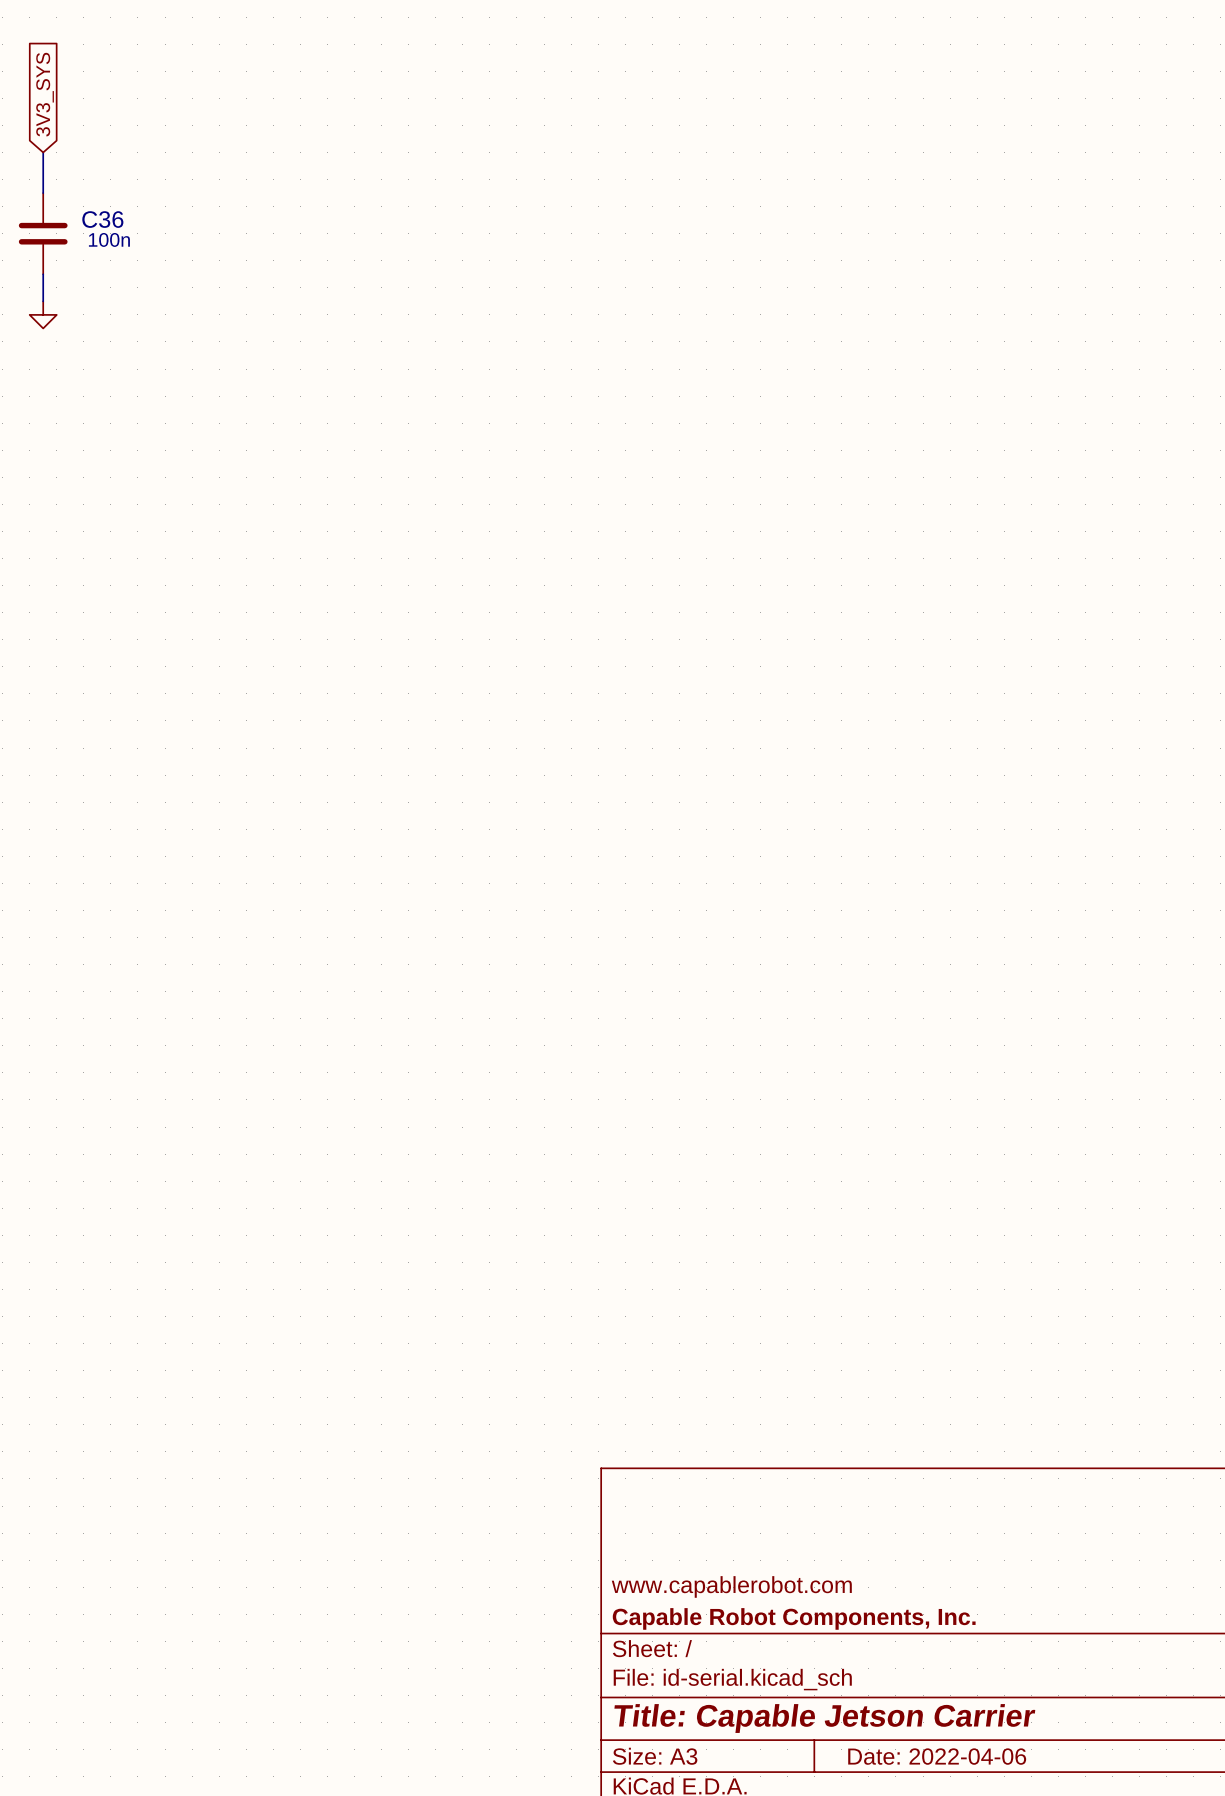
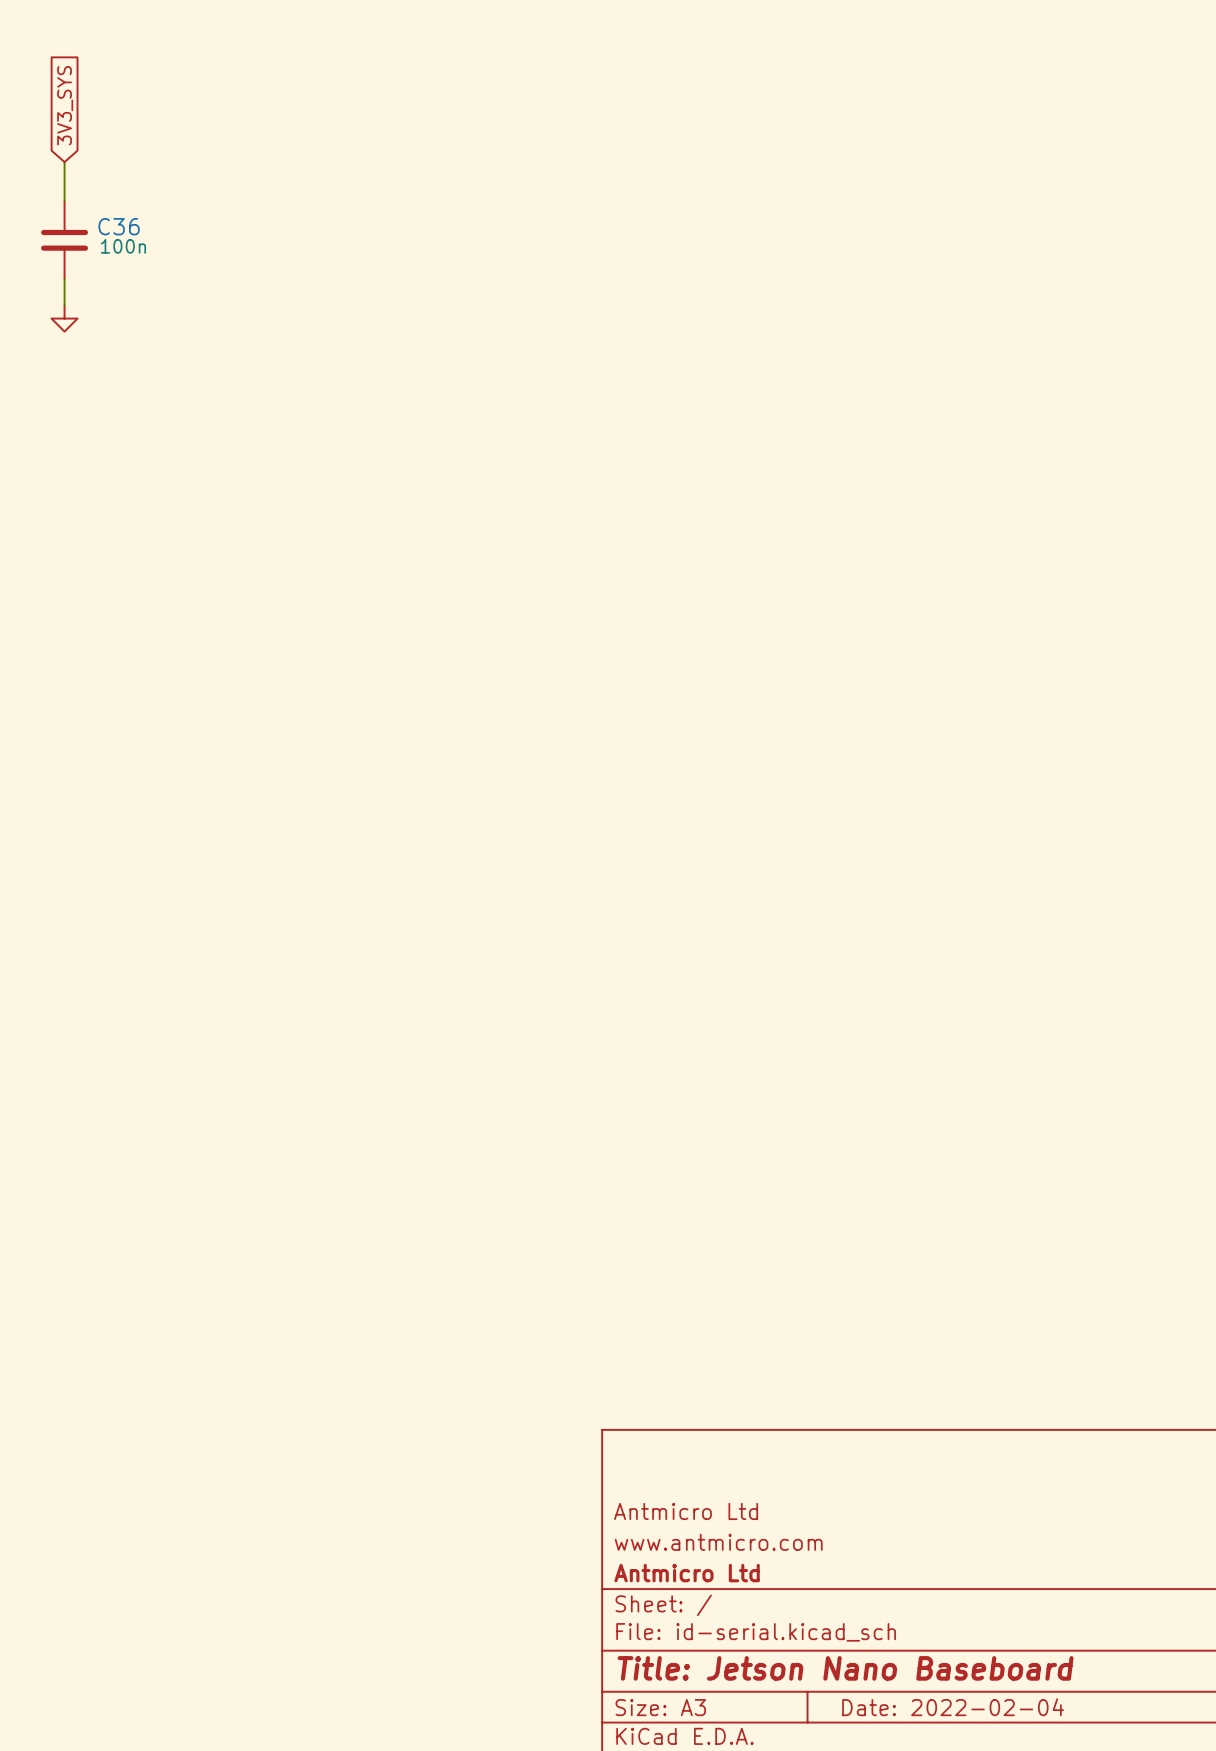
title block: none -> Antmicro Ltd (686, 1511)
title block: www.capablerobot.com (731, 1586) -> www.antmicro.com (718, 1542)
title block: Capable Robot Components, Inc. (794, 1618) -> Antmicro Ltd (687, 1573)
title block: Title: Capable Jetson Carrier (824, 1718) -> Title: Jetson Nano Baseboard (845, 1668)
title block: Date: 2022-04-06 (937, 1756) -> Date: 2022-02-04 (953, 1707)

